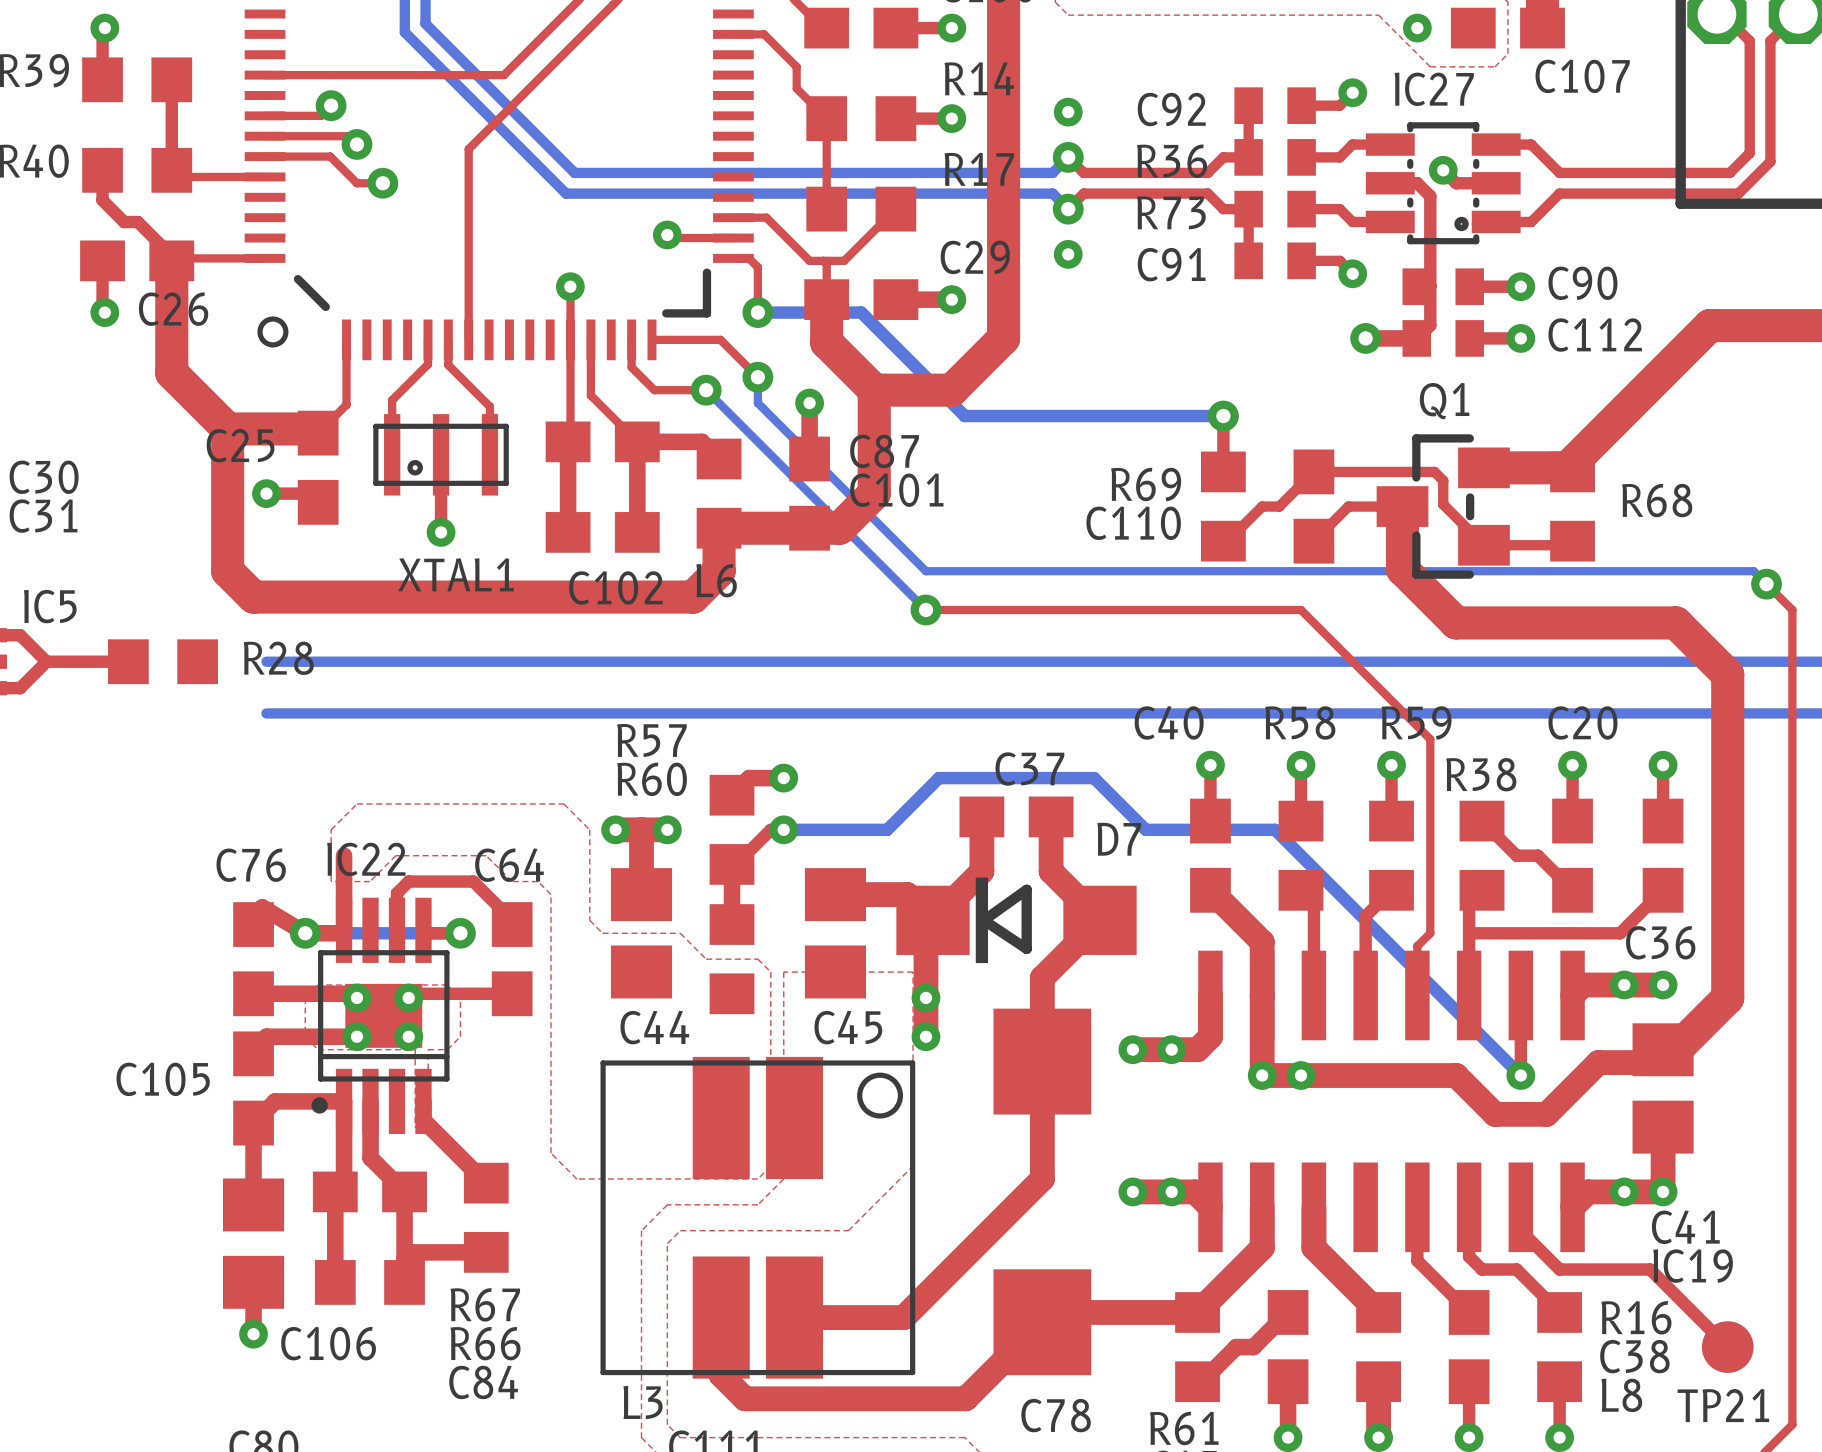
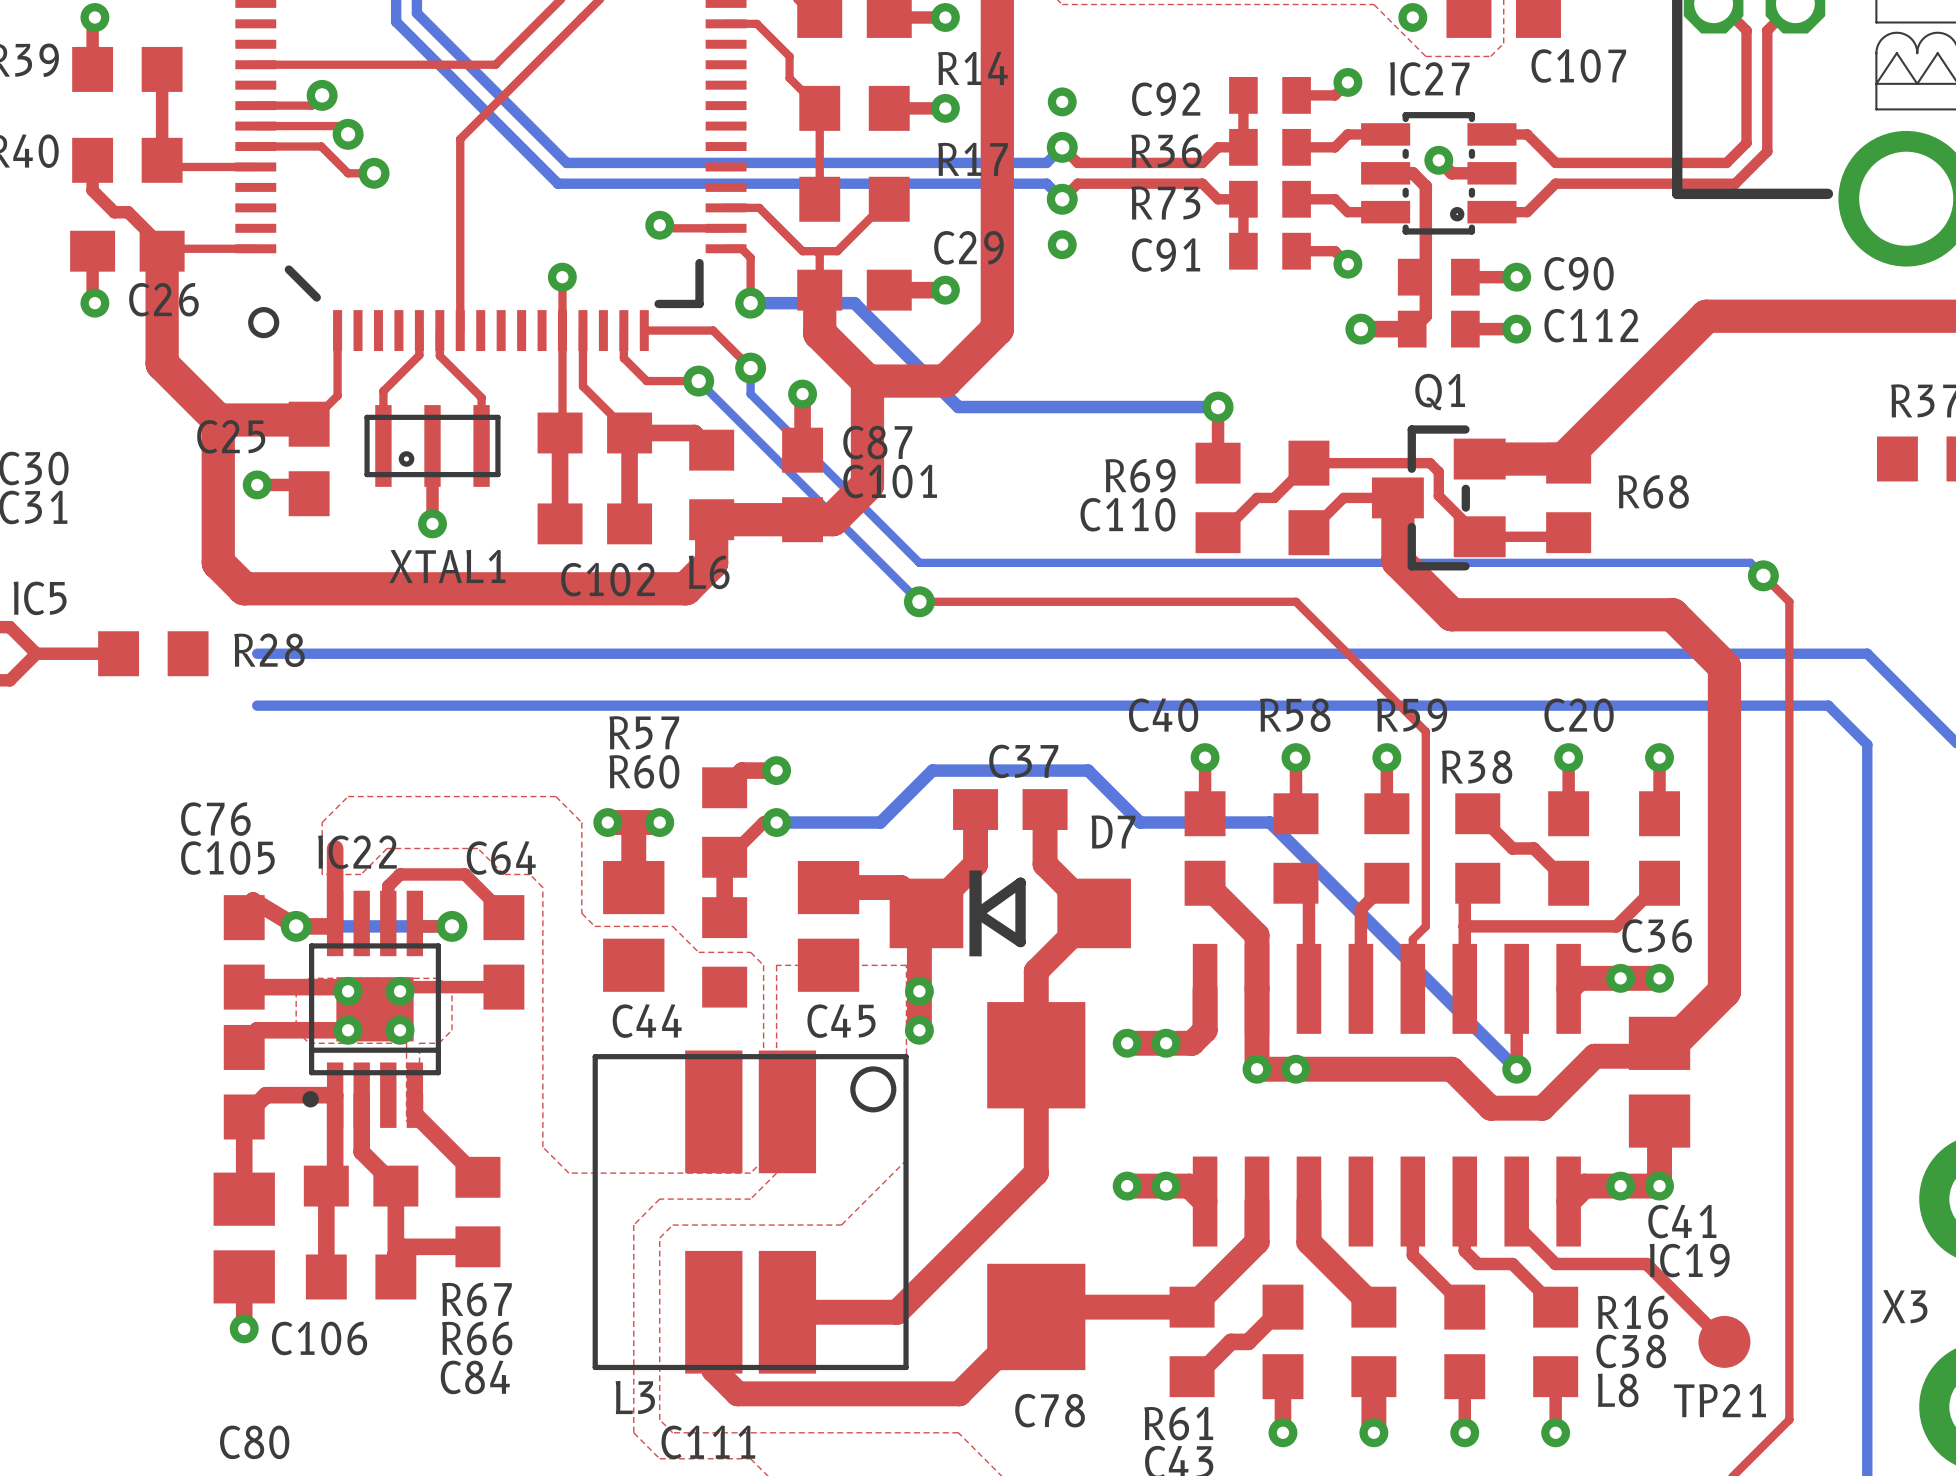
C76 name position: C76 (251, 865) -> C76 (215, 819)
C105 name position: C105 (163, 1079) -> C105 (227, 858)

